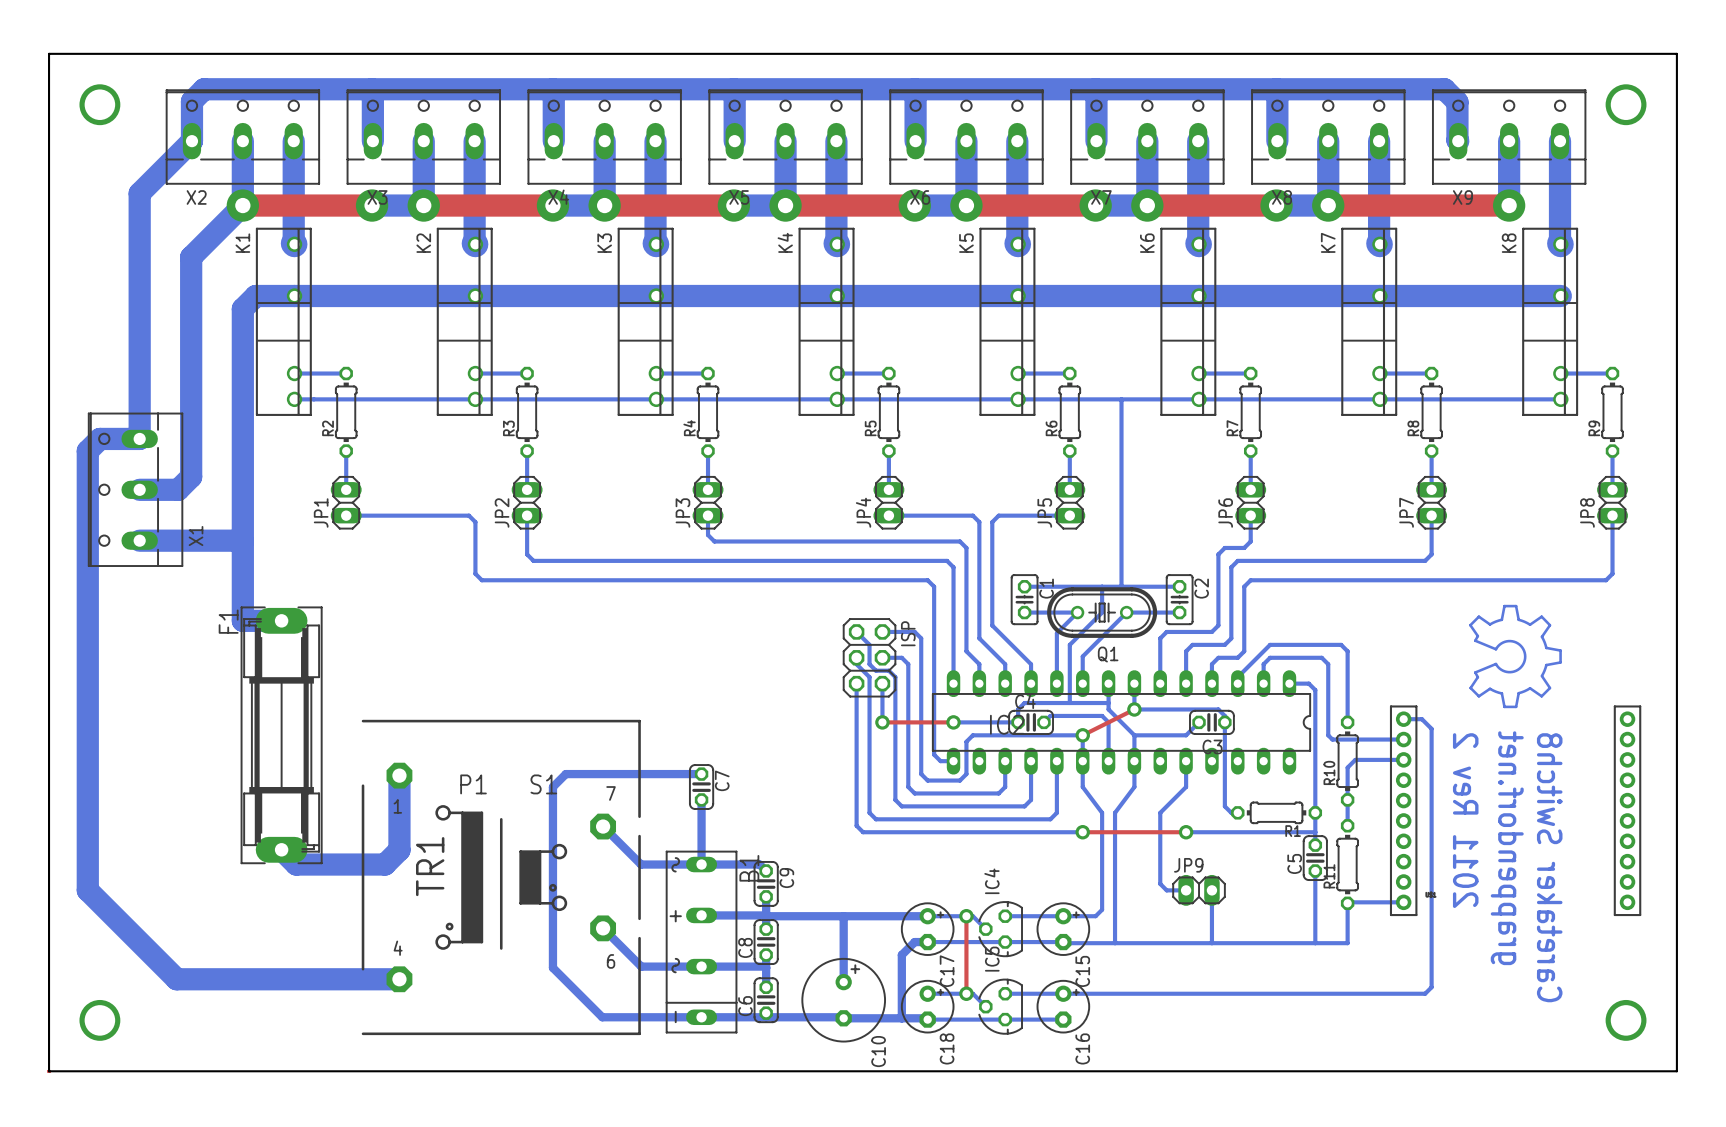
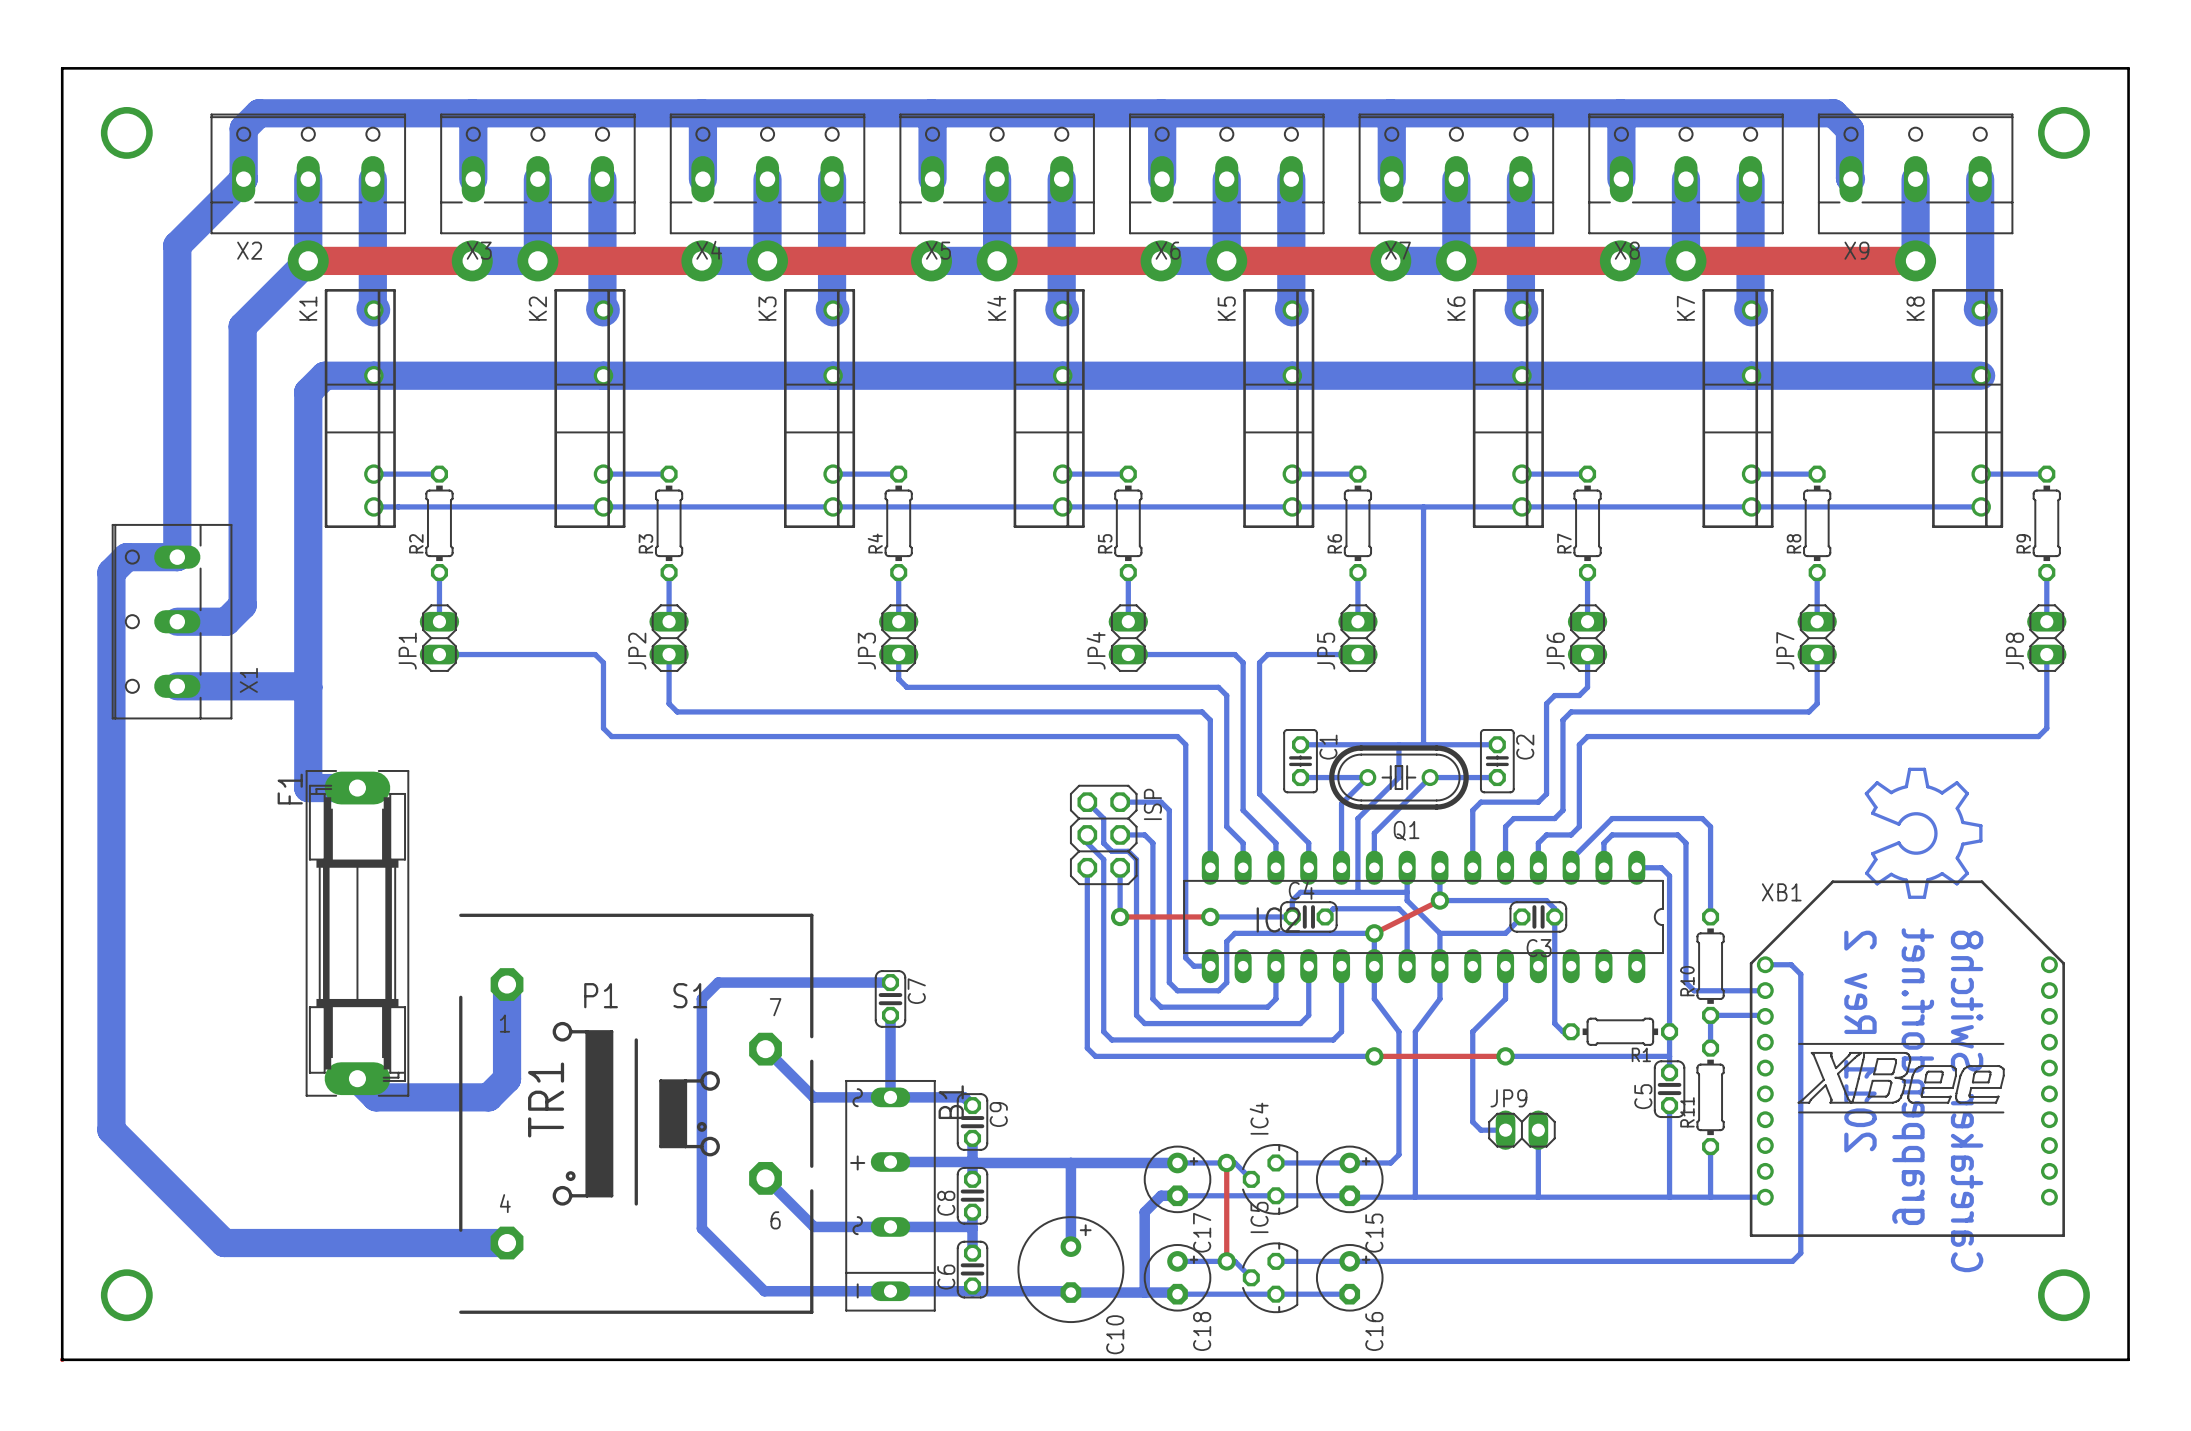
bottom track: (1403, 719) (1421, 719) (1431, 728) (1431, 987) (1425, 993) (1412, 993) -> (1765, 964) (1791, 964) (1800, 974) (1800, 1253) (1792, 1261)
bottom track: (1328, 735) (1332, 739) (1403, 739) -> (1685, 933) (1685, 982) (1694, 990) (1765, 990)
bottom track: (1403, 759) (1355, 759) (1347, 767) (1347, 799) -> (1765, 1016) (1710, 1015)
part: (1515, 810) -> none
XB1: none -> (1907, 1058)
bottom track: (1403, 902) (1347, 903) -> none
bottom track: none -> (1710, 1197) (1765, 1197)

